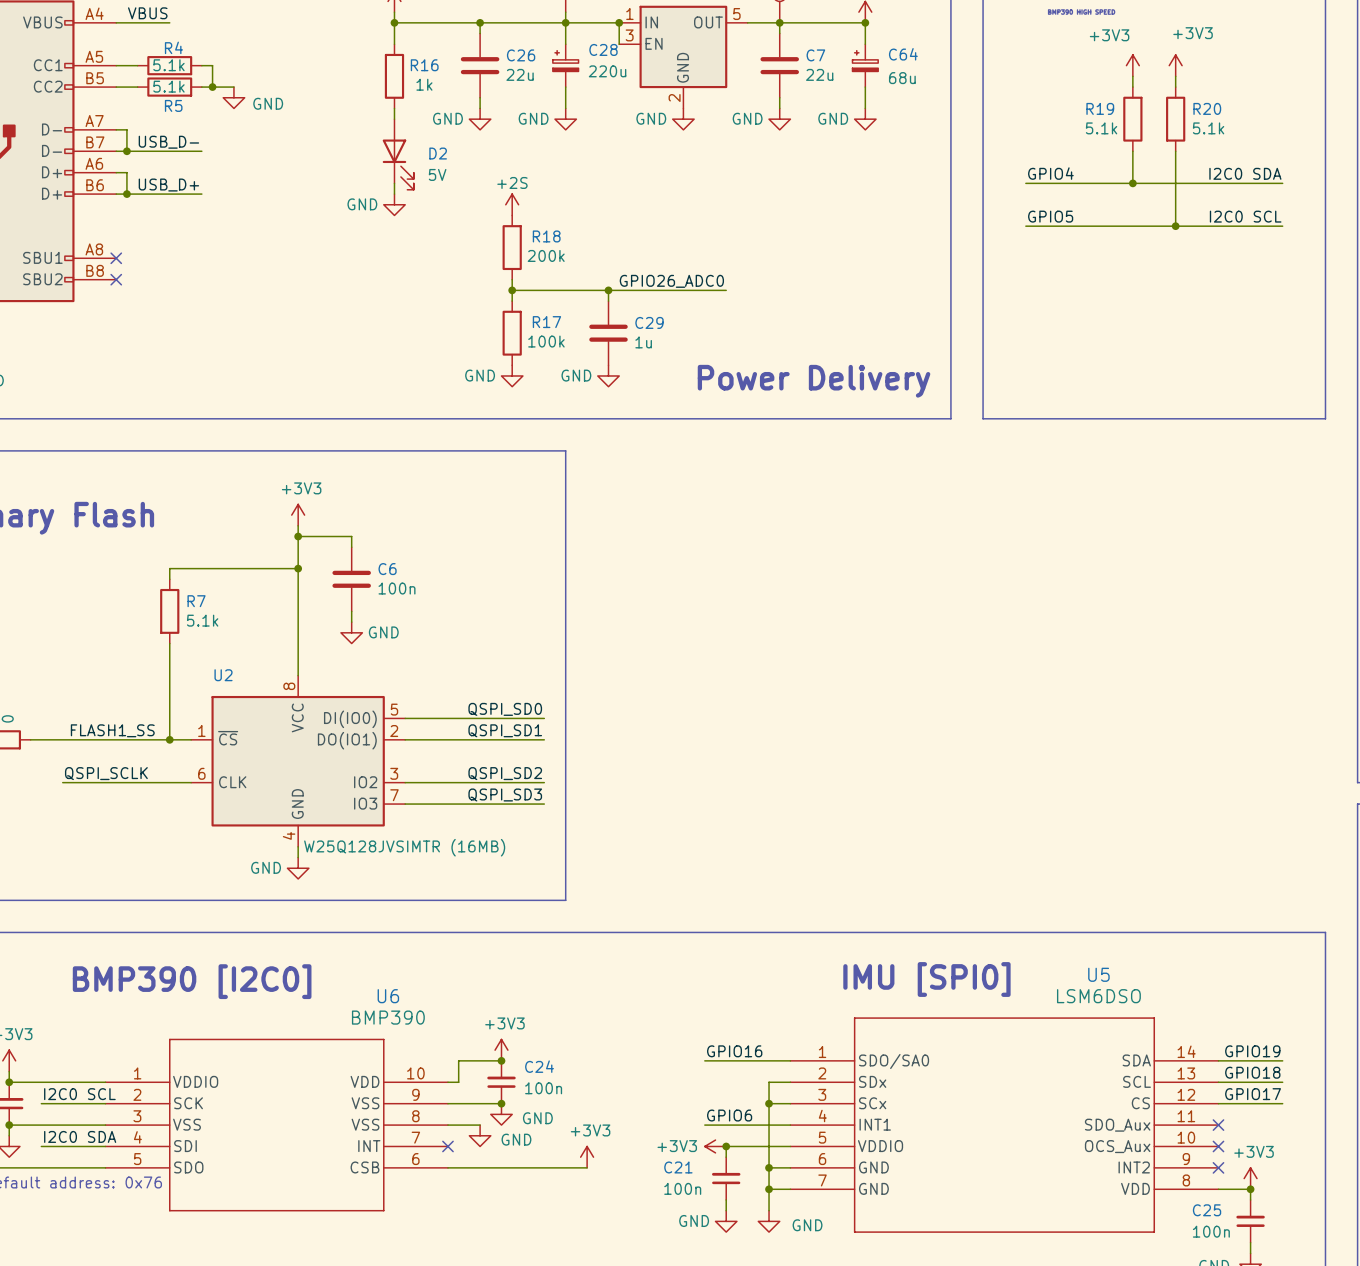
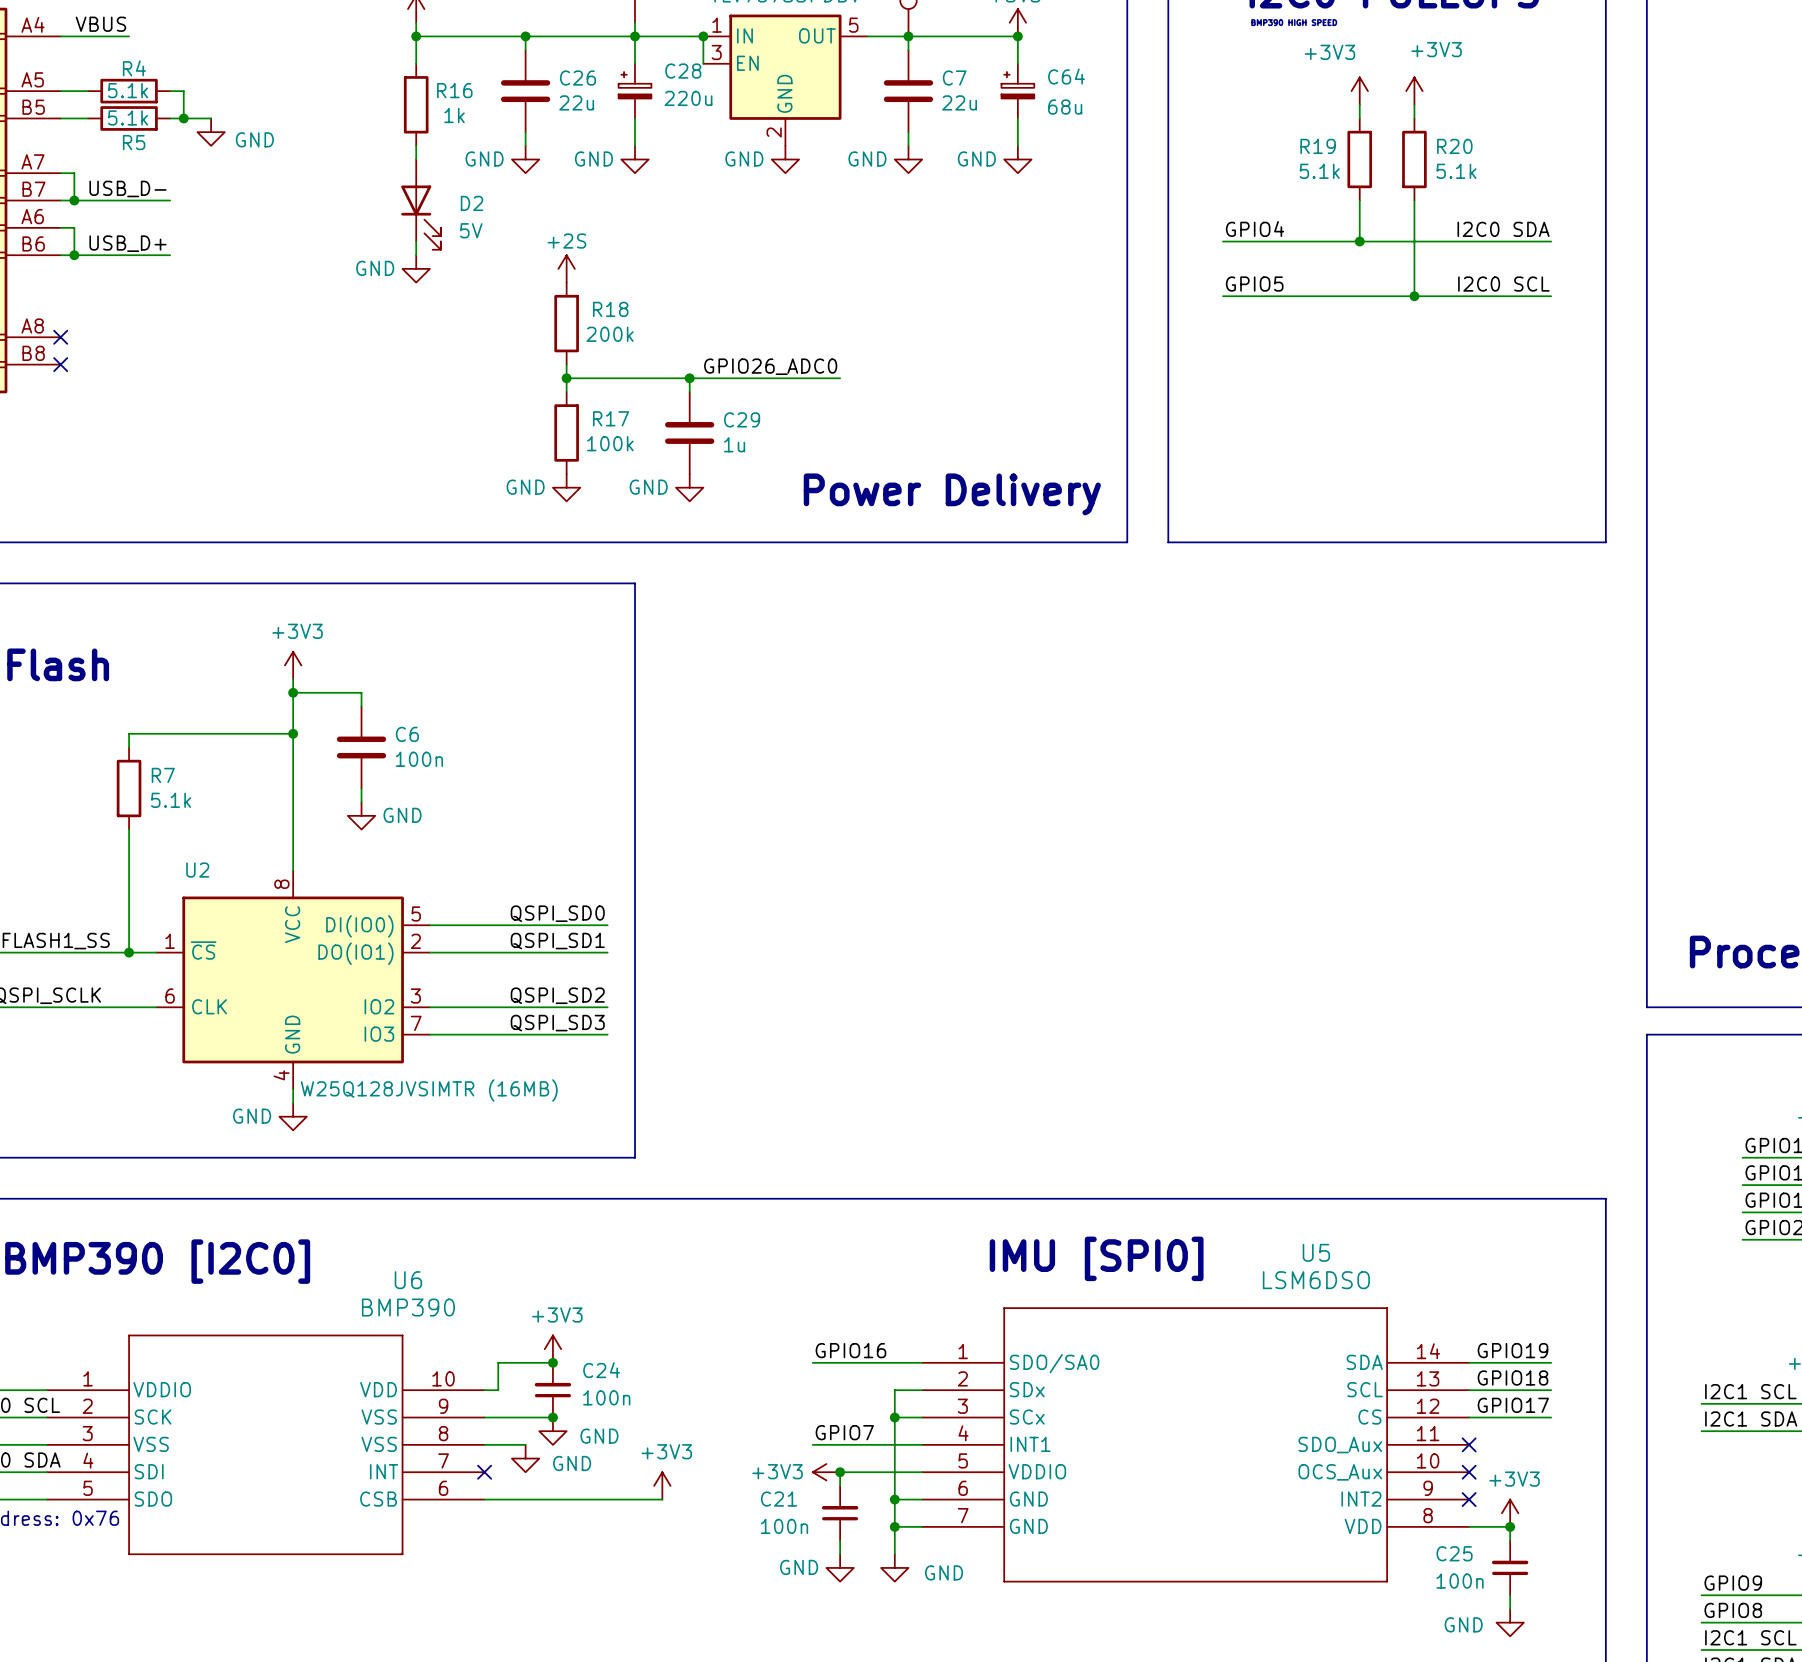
label: GPIO6 (729, 1115) -> GPIO7 (844, 1432)

